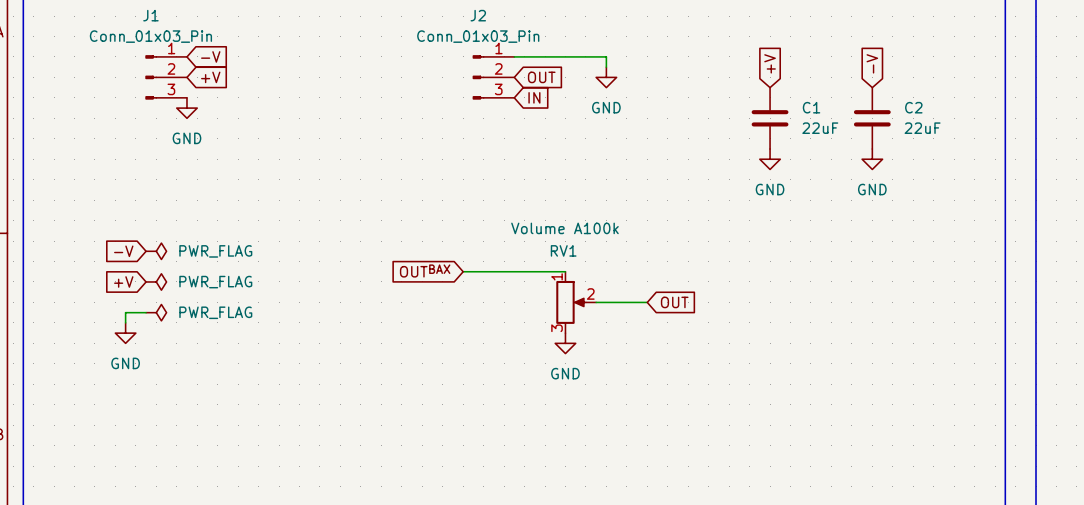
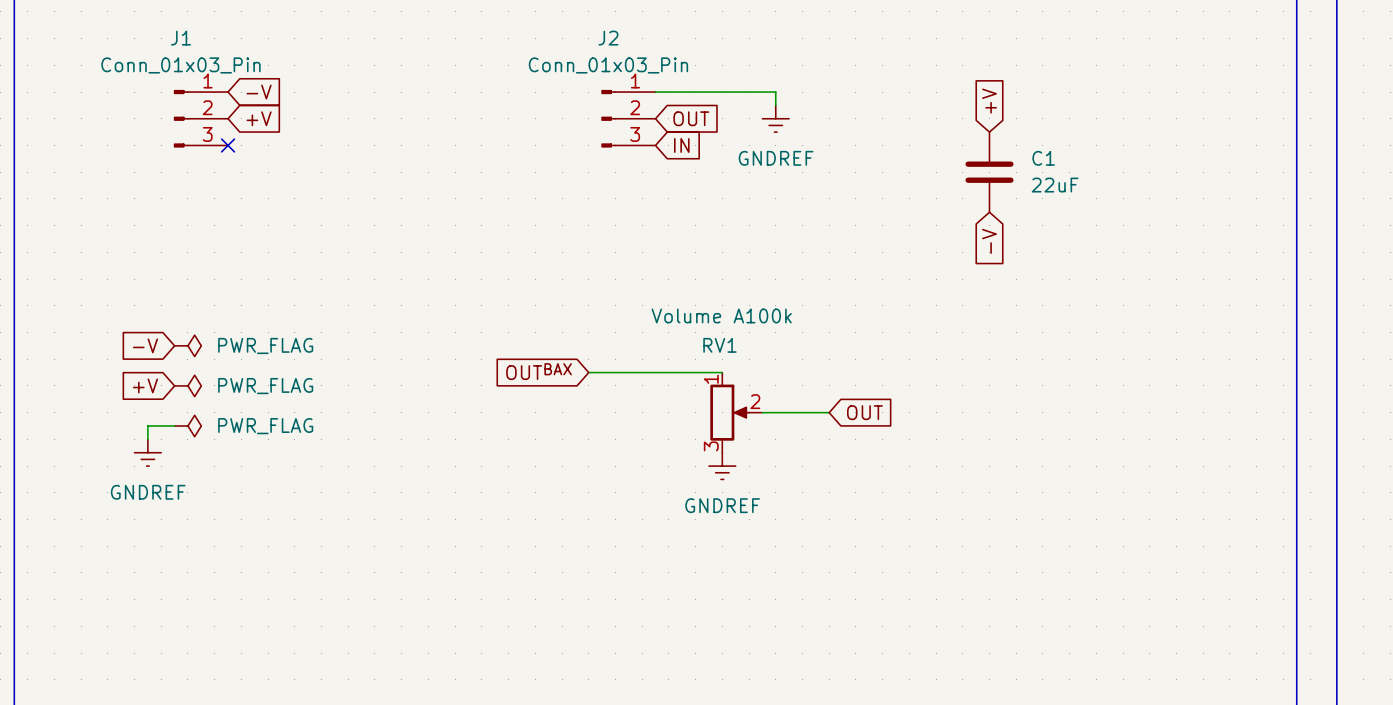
global label rotation: 0° (872, 63) -> 180° (989, 241)
global label position: -V (872, 63) -> -V (989, 241)
power symbol: GND (606, 77) -> GNDREF (775, 118)
no-connect mark: none -> (228, 145)
power symbol: GND (186, 108) -> none
C2: 22uF (872, 118) -> none
power symbol: GND (770, 159) -> none
power symbol: GND (872, 159) -> none
power symbol: GND (125, 333) -> GNDREF (147, 452)
power symbol: GND (565, 343) -> GNDREF (722, 466)

